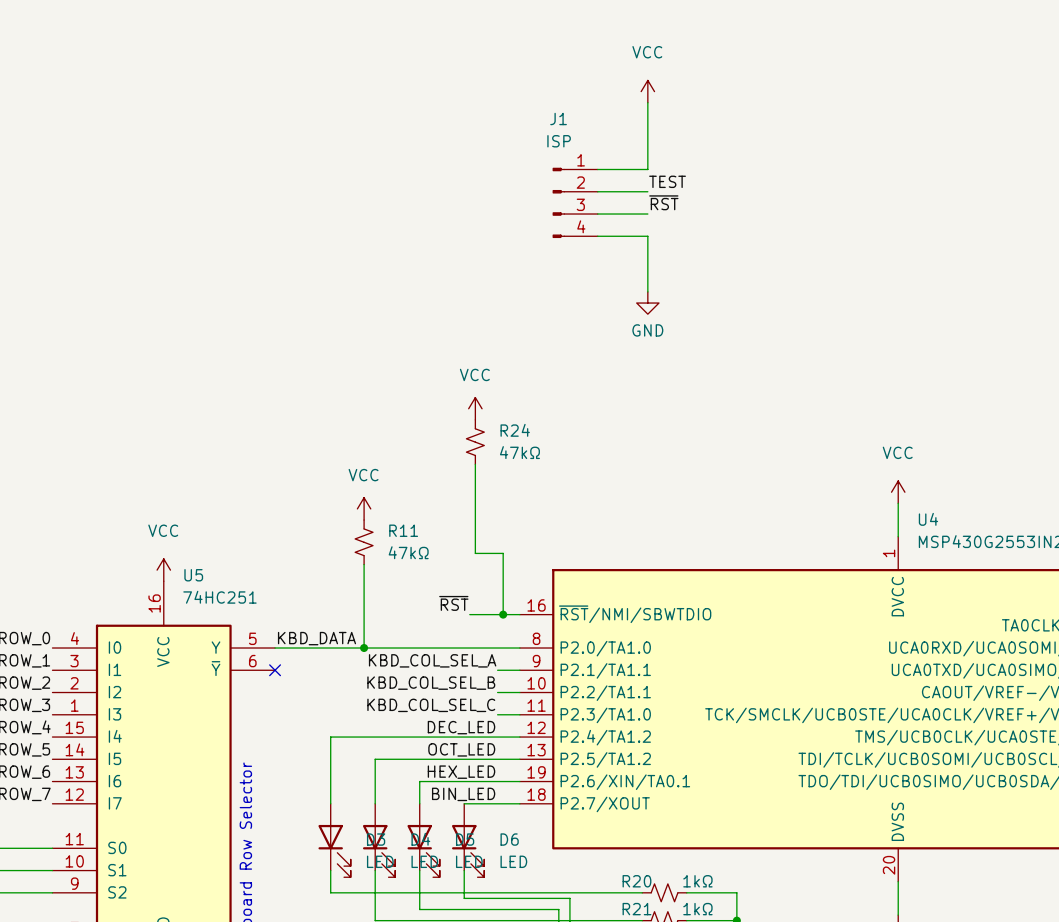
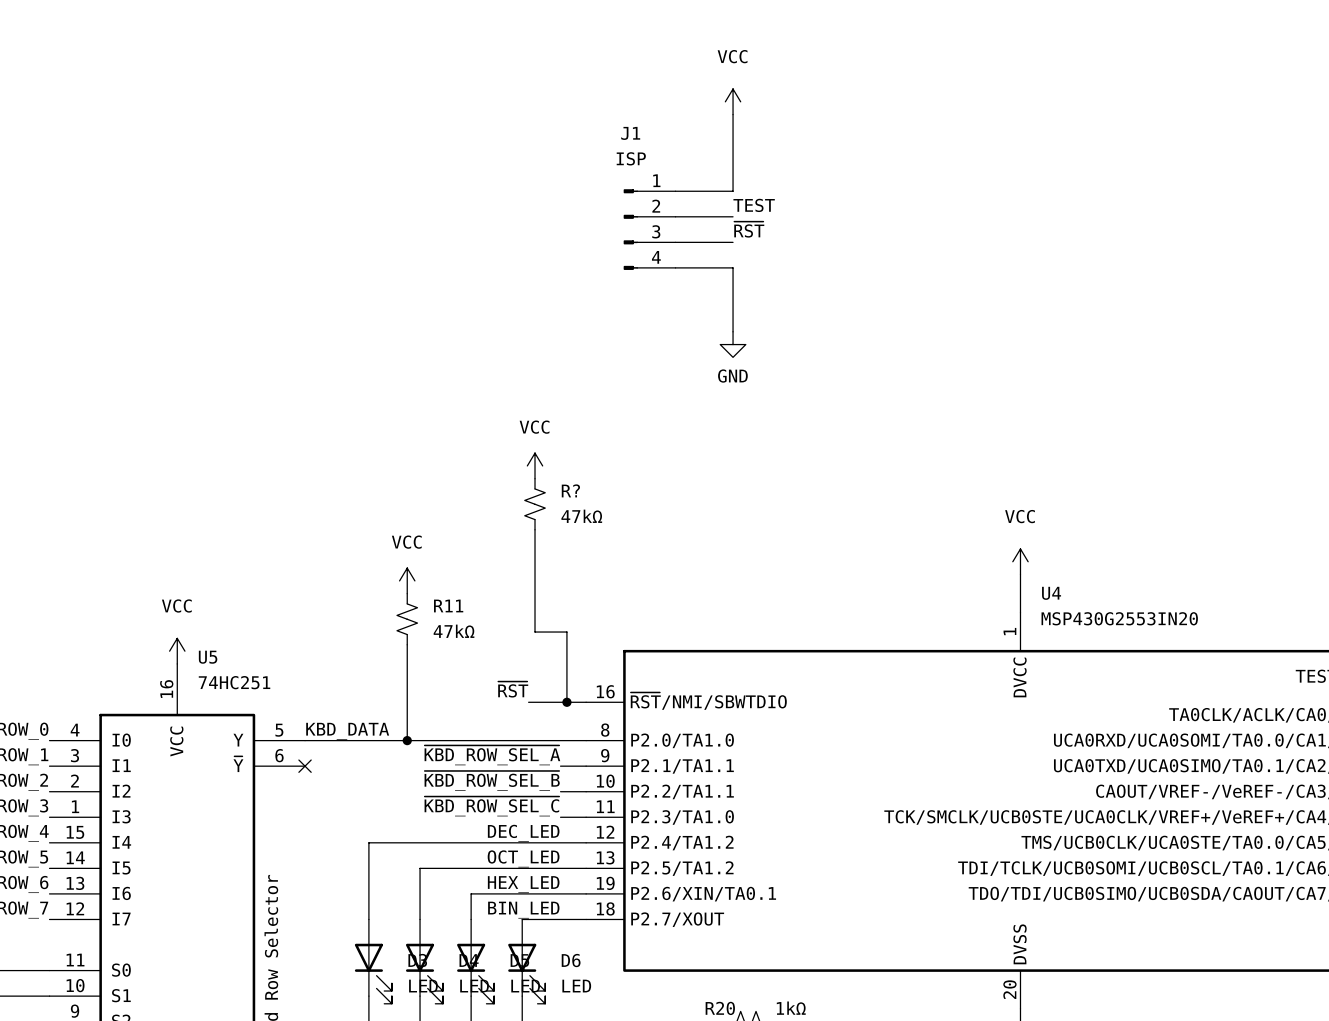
R24 name: R24 (515, 430) -> R? (570, 490)
label: KBD_COL_SEL_A (432, 660) -> ~{KBD_ROW_SEL_A} (492, 755)
label: KBD_COL_SEL_B (431, 683) -> ~{KBD_ROW_SEL_B} (492, 780)
label: KBD_COL_SEL_C (431, 705) -> ~{KBD_ROW_SEL_C} (491, 806)

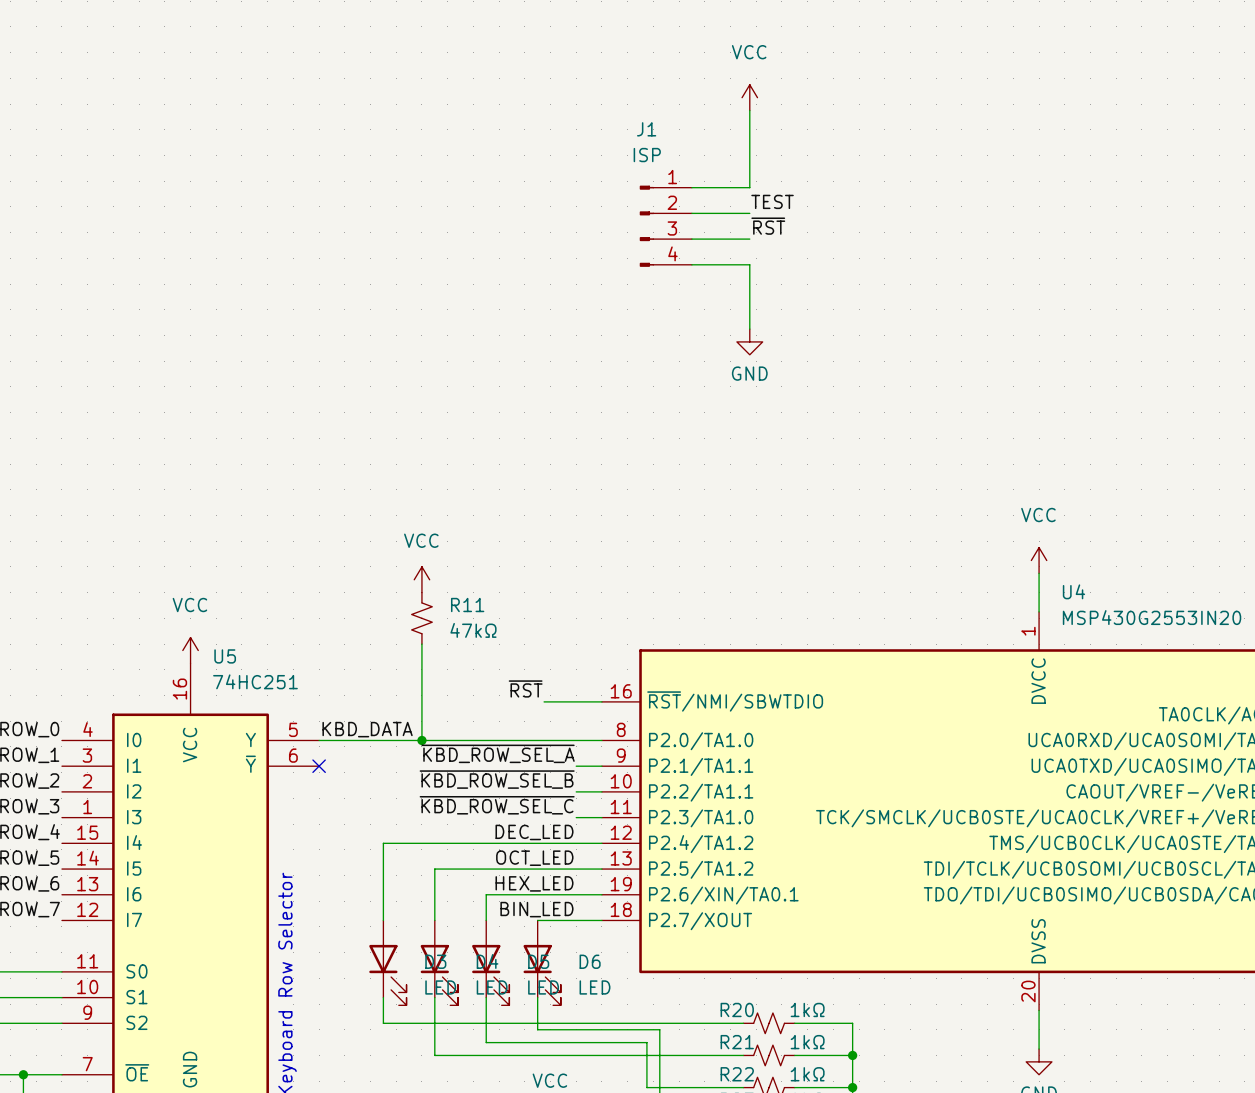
power symbol: VCC (535, 465) -> none
R?: 47kΩ (535, 504) -> none
wire: (535, 529) (535, 632) (566, 632) (566, 702) -> none
junction: (566, 702) -> none

